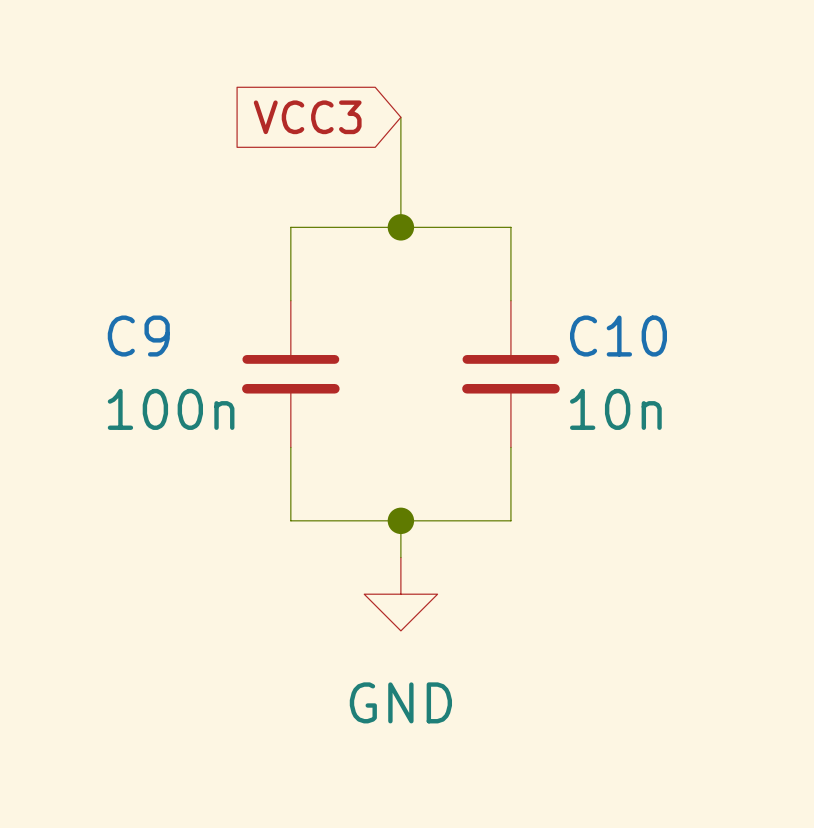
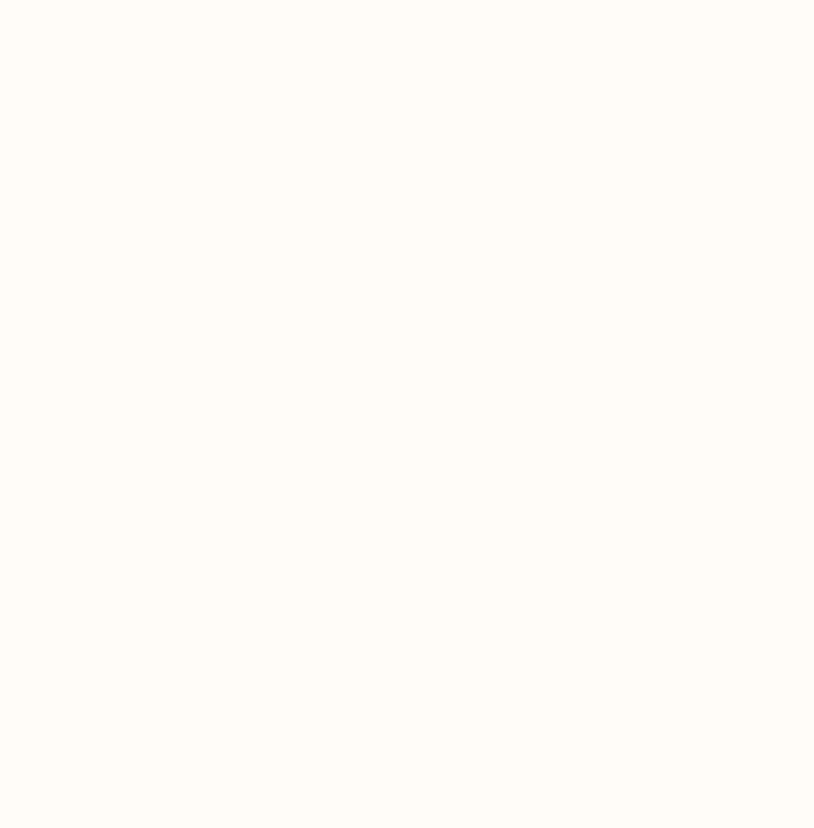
global label: VCC3 (307, 117) -> none
wire: (400, 117) (400, 227) -> none
junction: (400, 227) -> none
wire: (290, 300) (290, 227) (510, 227) (510, 300) -> none
C9: 100n (290, 374) -> none
C10: 10n (510, 374) -> none
wire: (290, 447) (290, 520) (510, 520) (510, 447) -> none
wire: (400, 520) (400, 557) -> none
junction: (400, 520) -> none
power symbol: GND (400, 594) -> none

